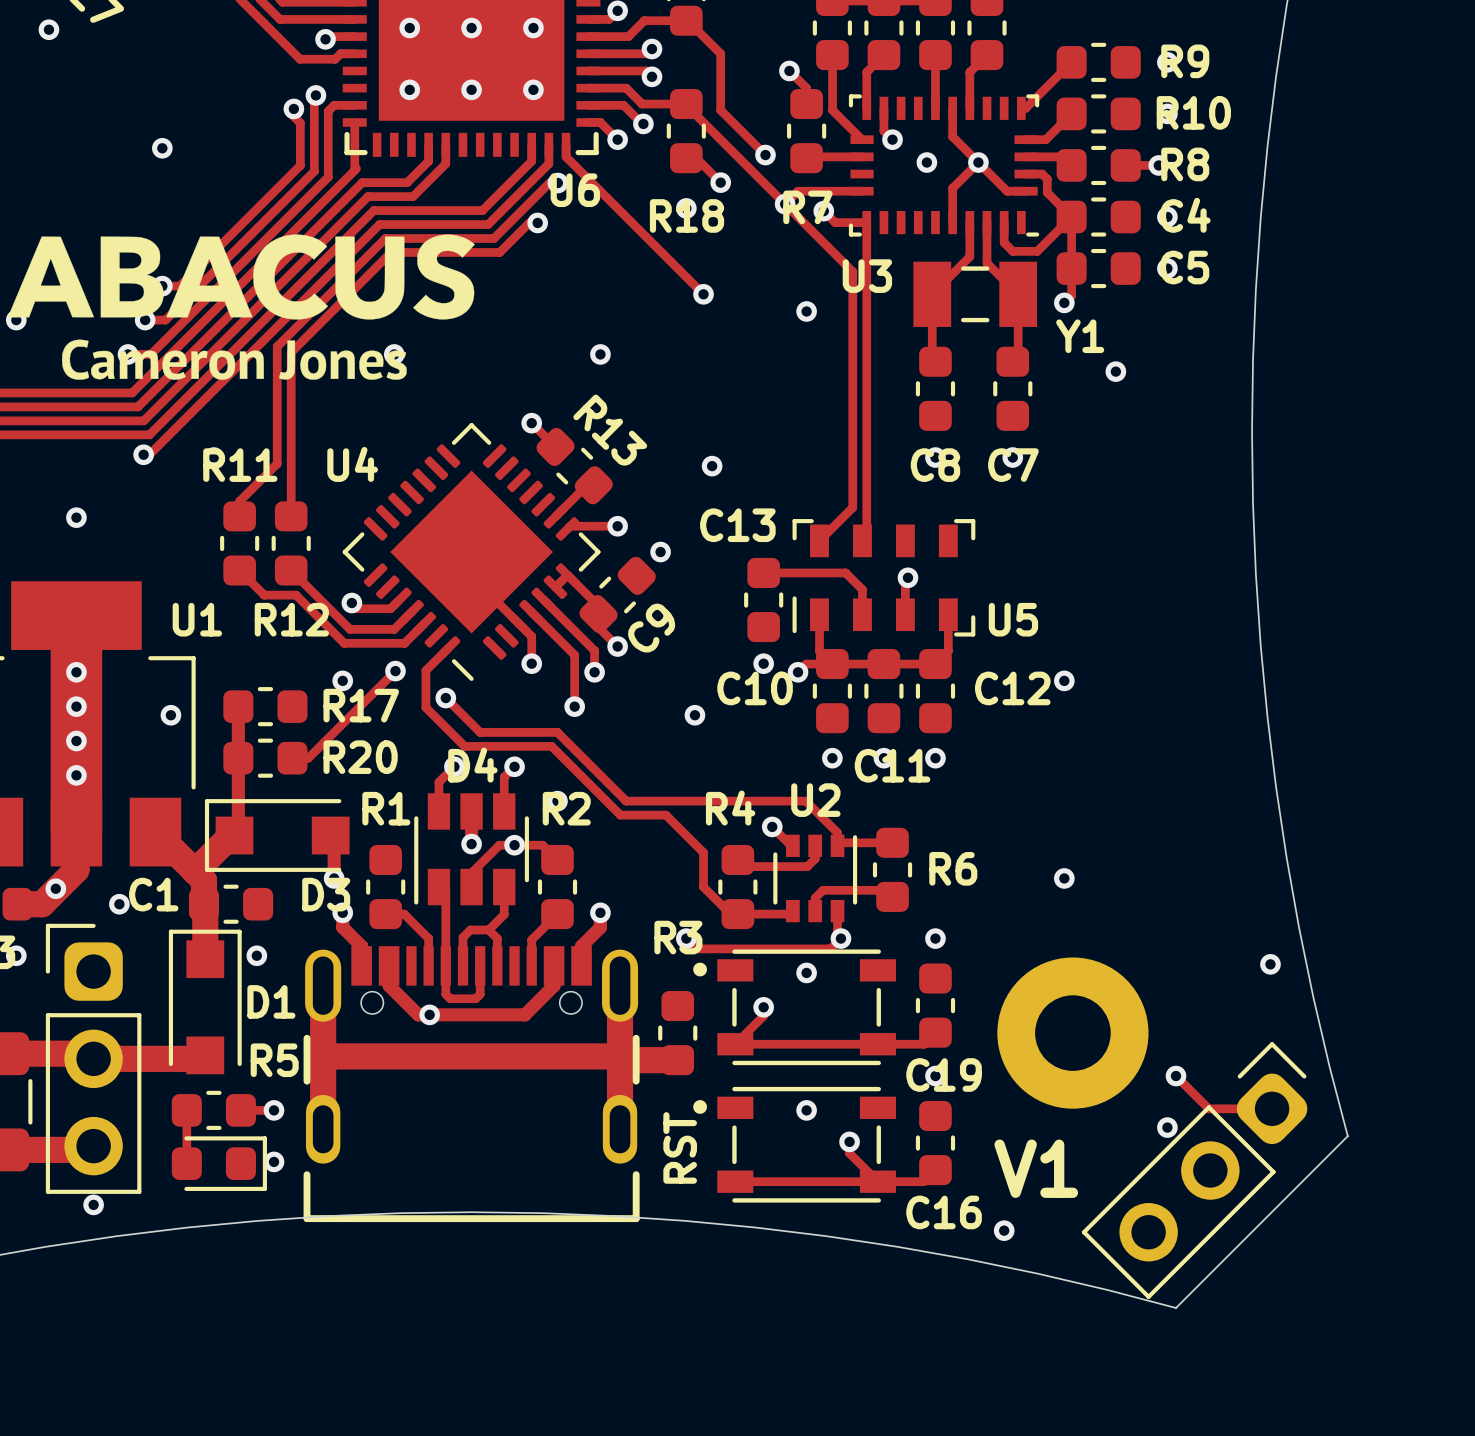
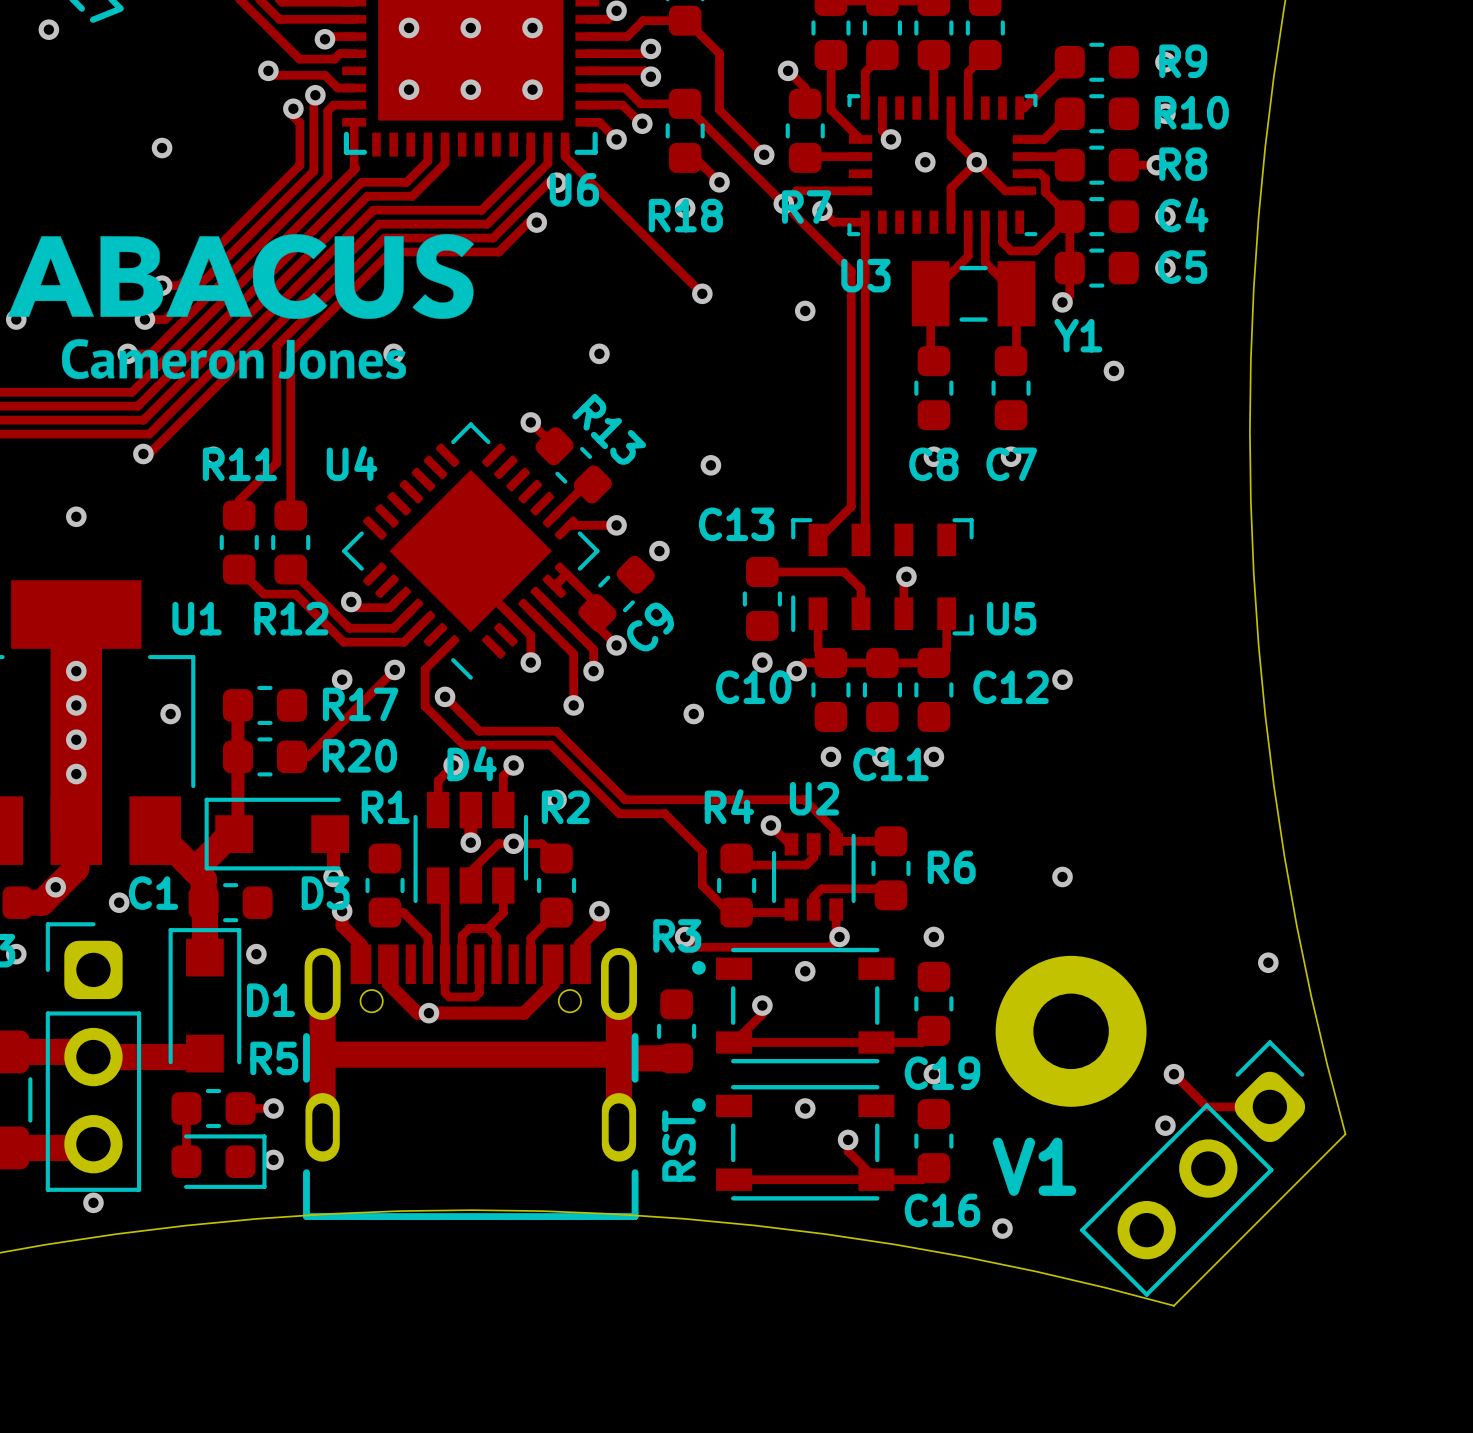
track: none -> (268, 70) (272, 75) (325, 75) (337, 87) (354, 87)
via: none -> (268, 70)

